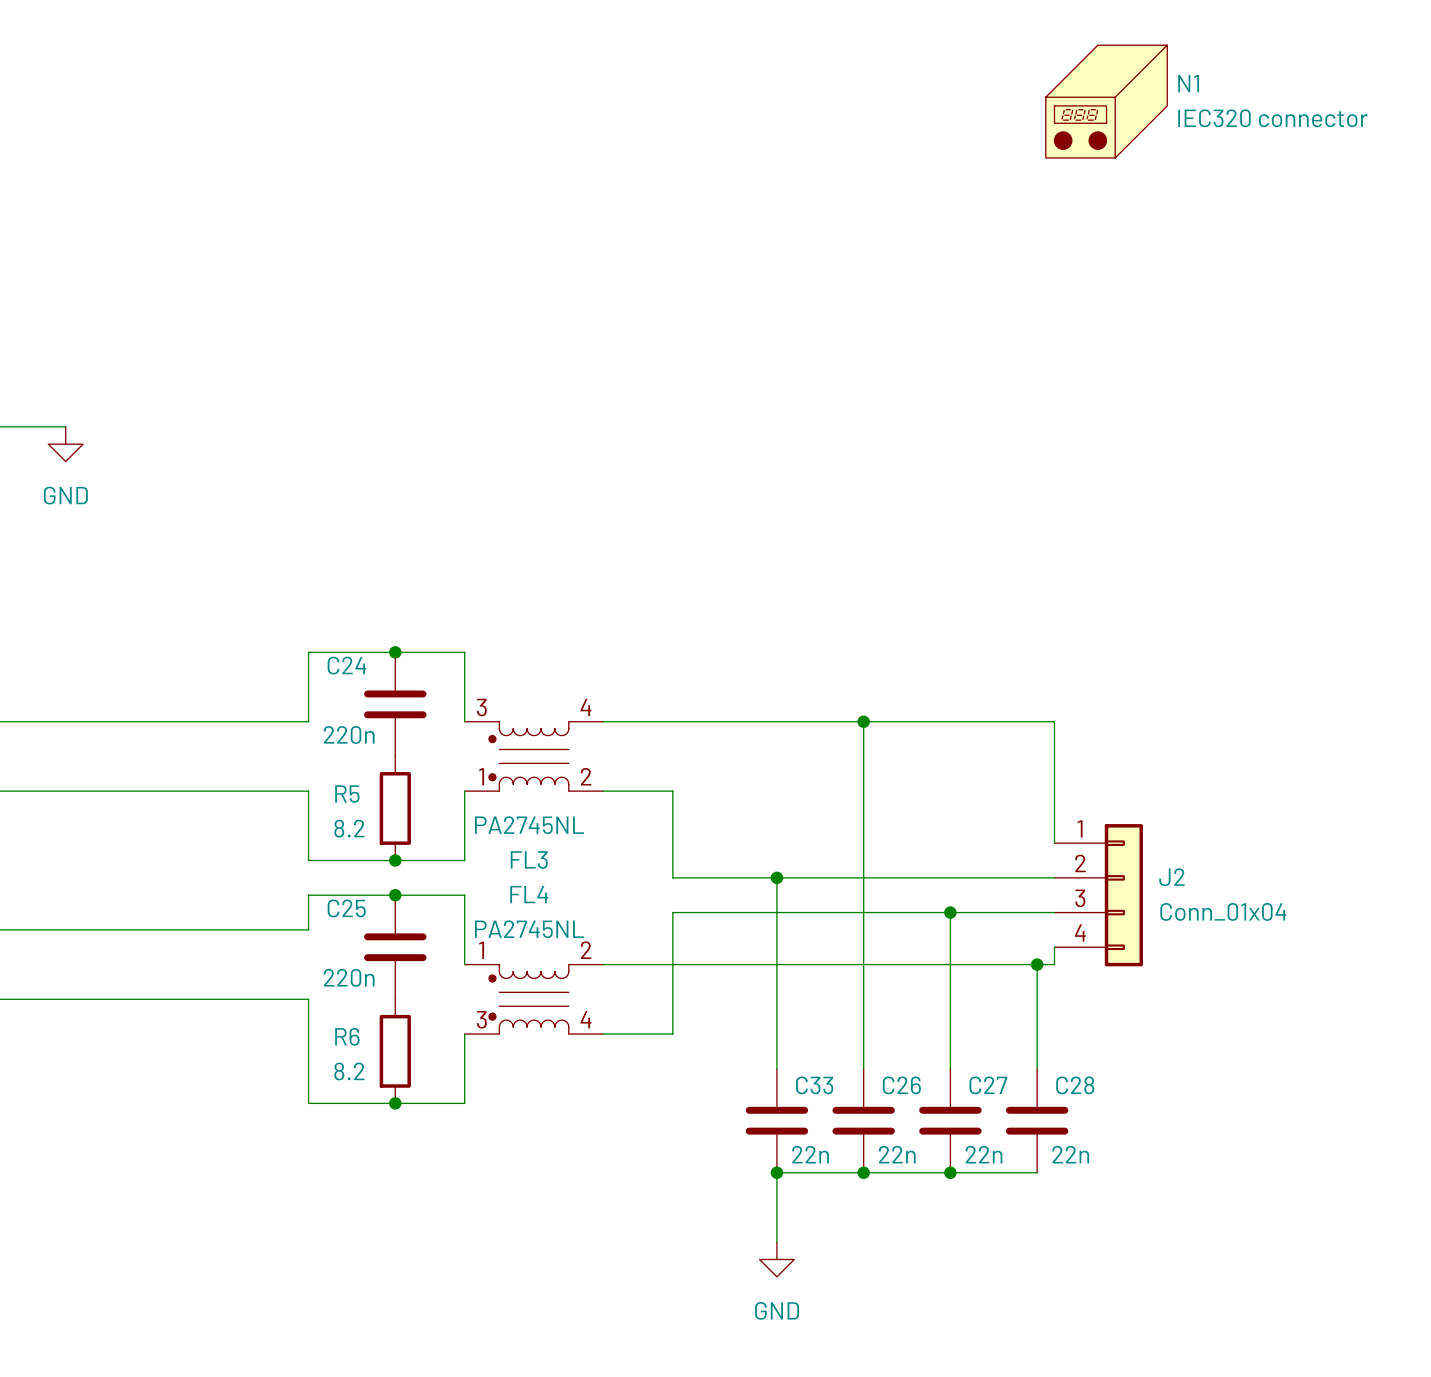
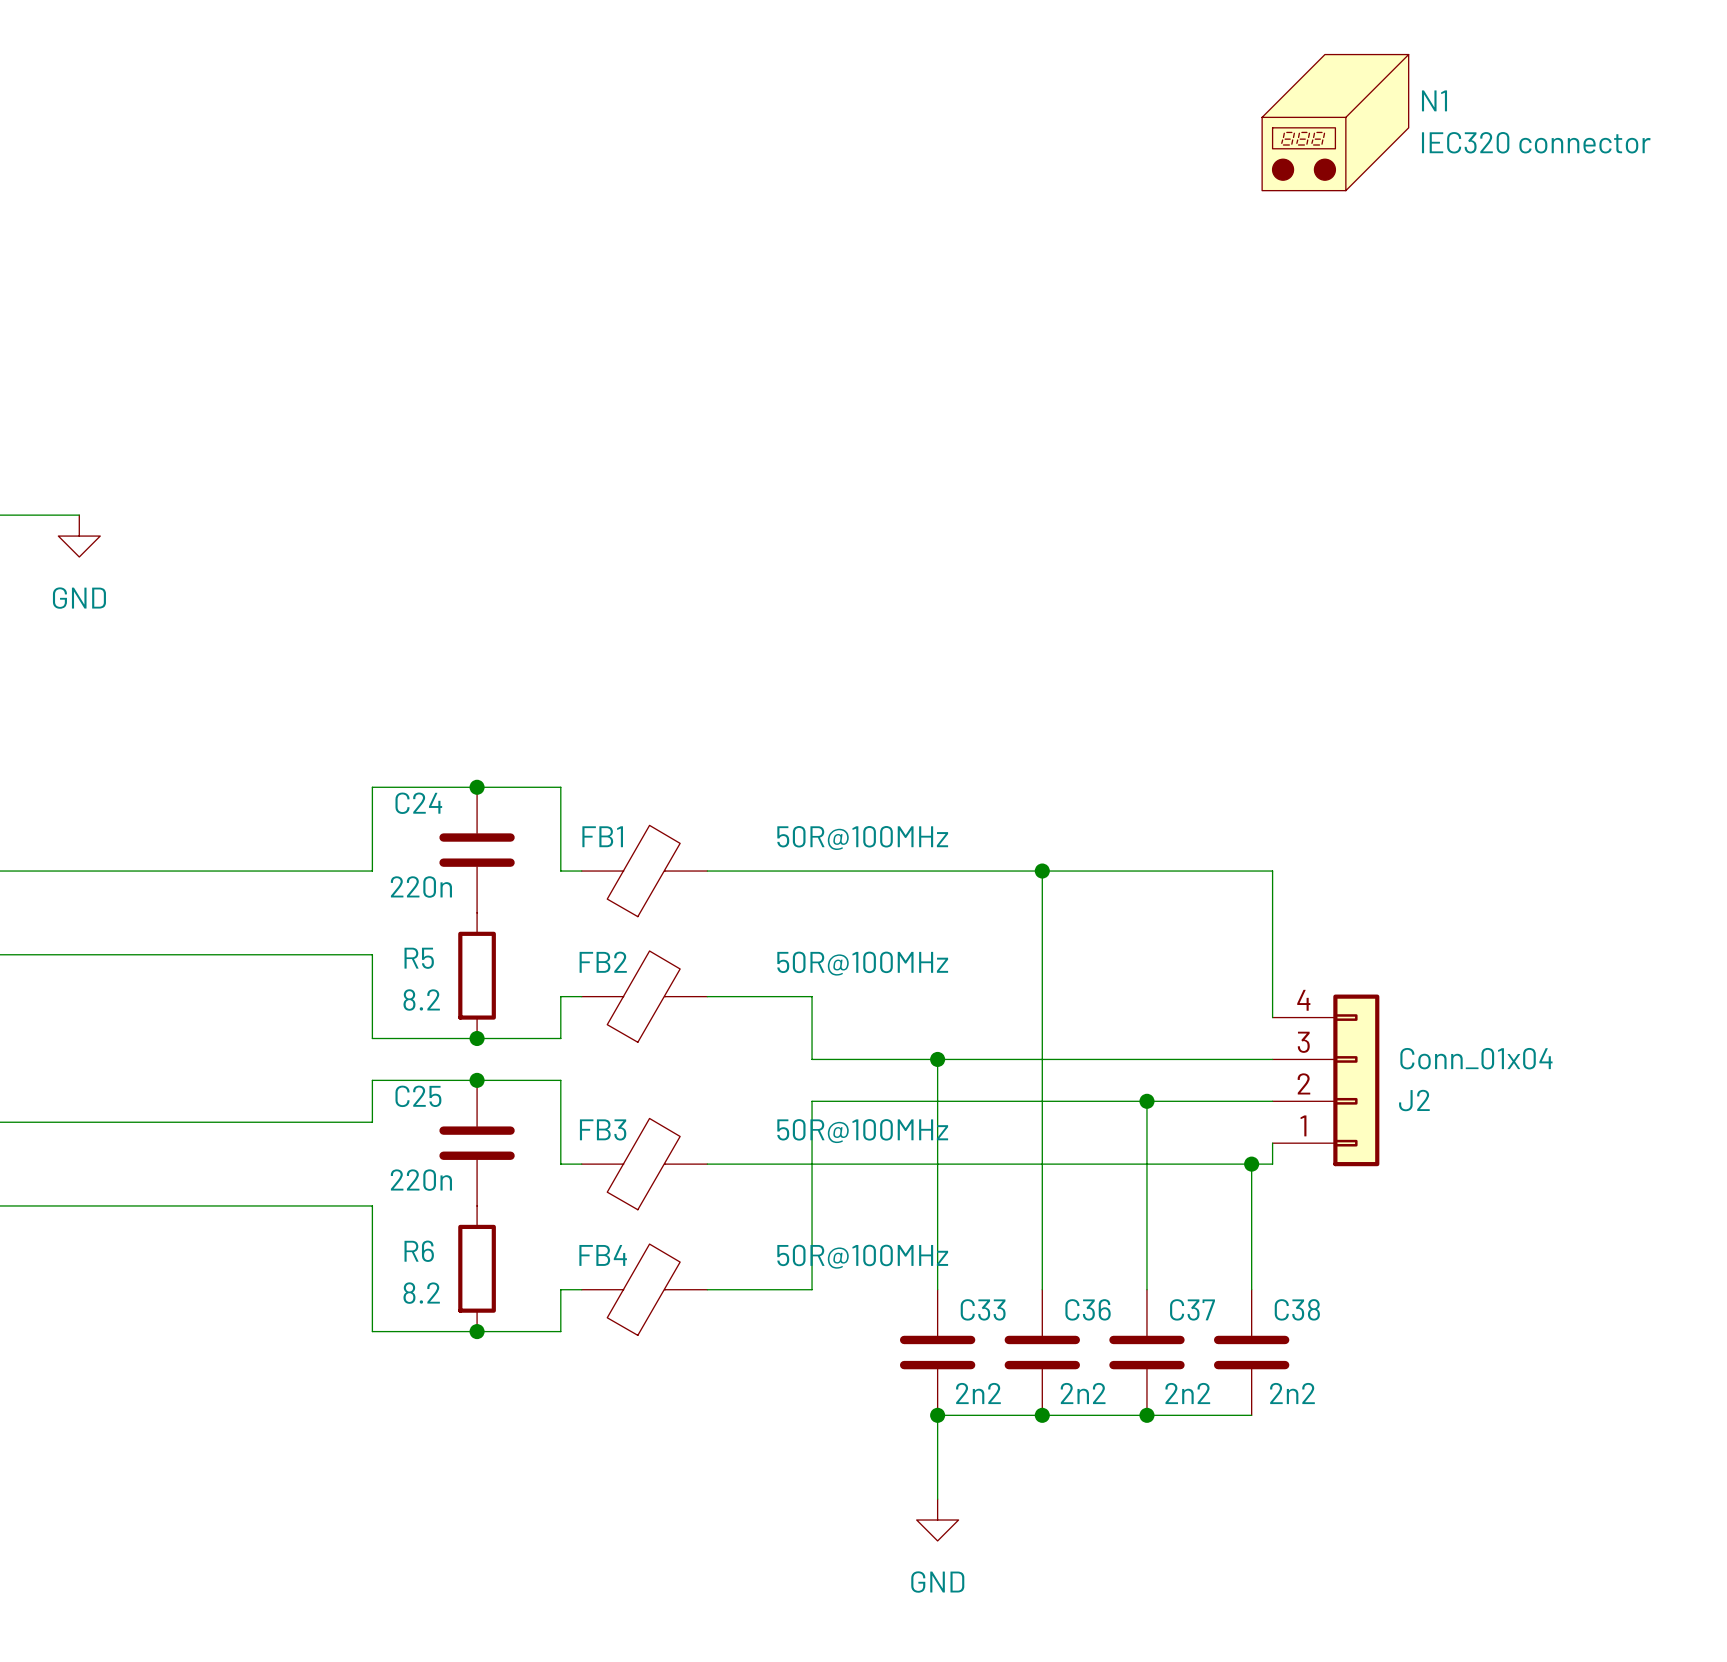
FB1: none -> 50R@100MHz (644, 871)
FL3: PA2745NL (534, 756) -> none
wire: (464, 791) (464, 825) -> (581, 996) (560, 996)
wire: (603, 791) (672, 791) (672, 825) -> (707, 996) (812, 996)
FB2: none -> 50R@100MHz (644, 996)
J2 flip: as is (1123, 895) -> up-down (1356, 1080)
FB3: none -> 50R@100MHz (644, 1164)
FL4: PA2745NL (534, 999) -> none
wire: (464, 1033) (464, 1068) -> (581, 1289) (560, 1289)
wire: (603, 1033) (672, 1033) -> (707, 1289) (812, 1289) (812, 1247)
FB4: none -> 50R@100MHz (644, 1289)
C26 name: C26 (901, 1085) -> C36 (1088, 1309)
C27 name: C27 (988, 1085) -> C37 (1192, 1309)
C28 name: C28 (1075, 1085) -> C38 (1297, 1309)
C33 value: 22n (810, 1154) -> 2n2 (978, 1393)
C26 value: 22n (897, 1154) -> 2n2 (1083, 1393)
C27 value: 22n (984, 1154) -> 2n2 (1187, 1393)
C28 value: 22n (1070, 1154) -> 2n2 (1292, 1393)

